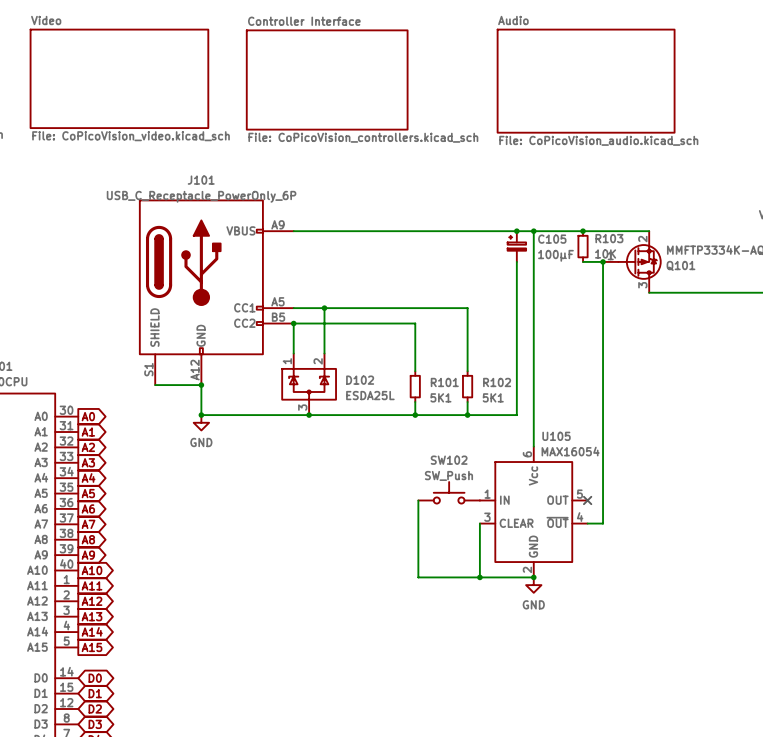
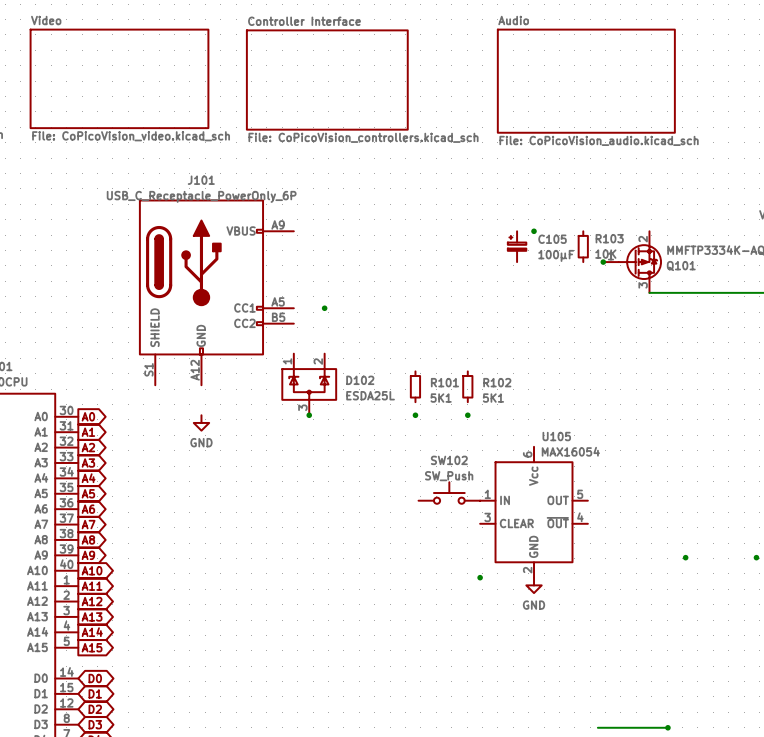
wire: (293, 231) (649, 231) -> none
junction: (516, 231) -> none
wire: (533, 231) (533, 446) -> none
junction: (583, 231) -> none
wire: (516, 261) (516, 415) (201, 415) (201, 385) (155, 385) -> none
wire: (583, 261) (603, 261) (603, 523) (587, 523) -> none
wire: (293, 308) (467, 308) (467, 371) -> none
wire: (324, 308) (324, 353) -> none
junction: (293, 323) -> none
wire: (293, 353) (293, 323) (415, 323) (415, 371) -> none
junction: (201, 385) -> none
wire: (415, 402) (415, 415) -> none
wire: (467, 402) (467, 415) -> none
junction: (201, 415) -> none
wire: (418, 500) (418, 577) (533, 577) -> none
no-connect mark: (587, 500) -> none
wire: (479, 523) (479, 577) -> none
junction: none -> (685, 557)
junction: none -> (756, 557)
junction: (533, 577) -> none
wire: none -> (597, 727) (667, 727)
junction: none -> (667, 727)

